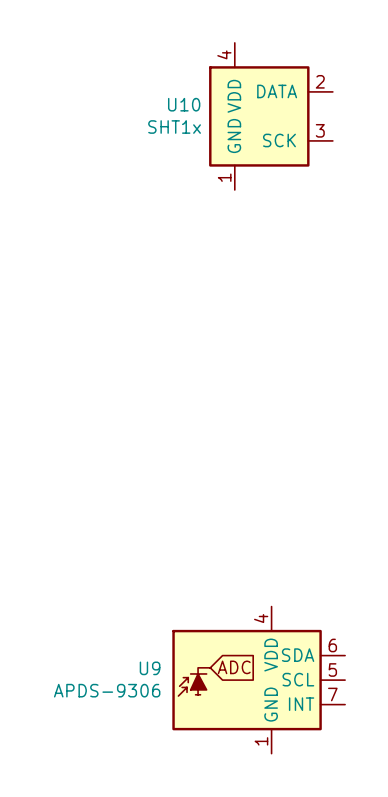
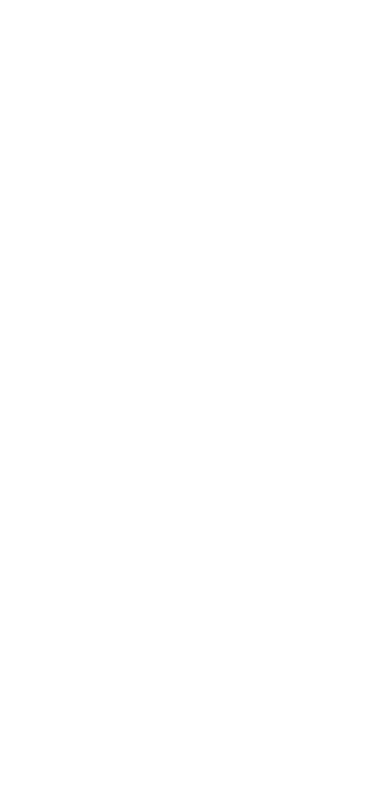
U10: SHT1x (270, 116) -> none
U9: APDS-9306 (258, 680) -> none

